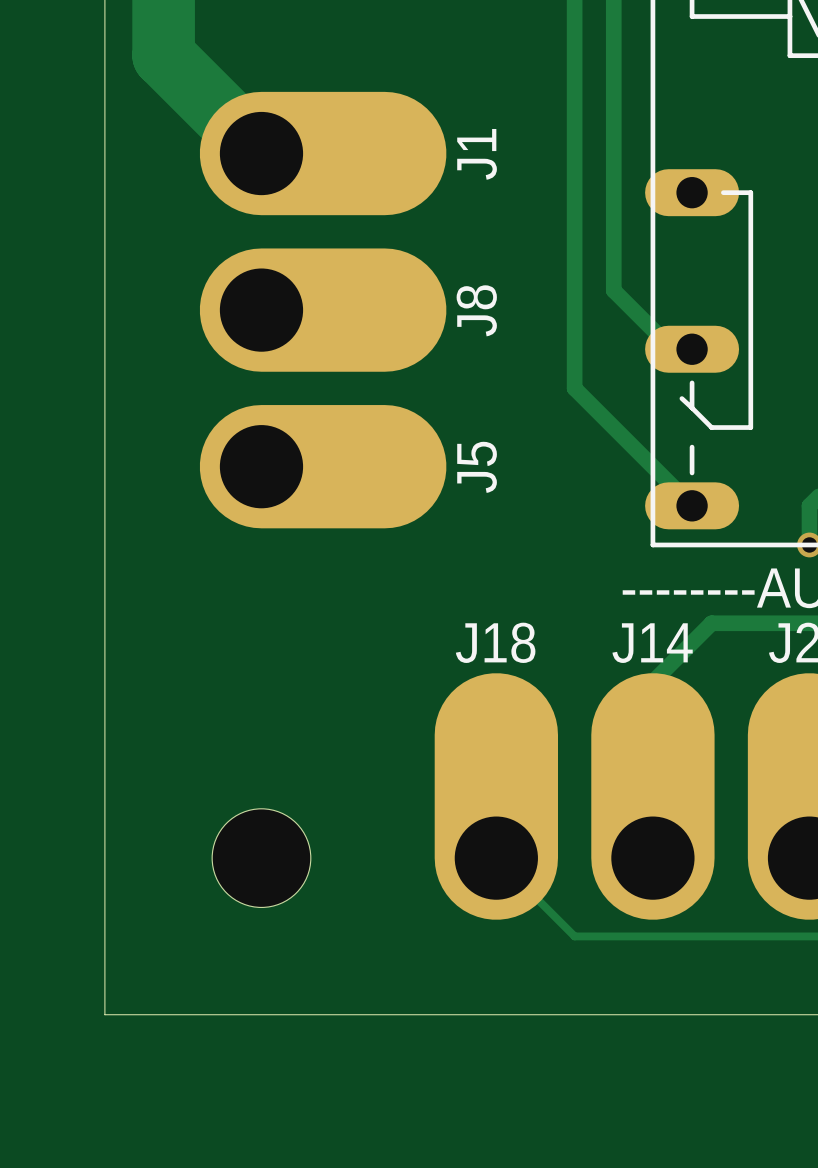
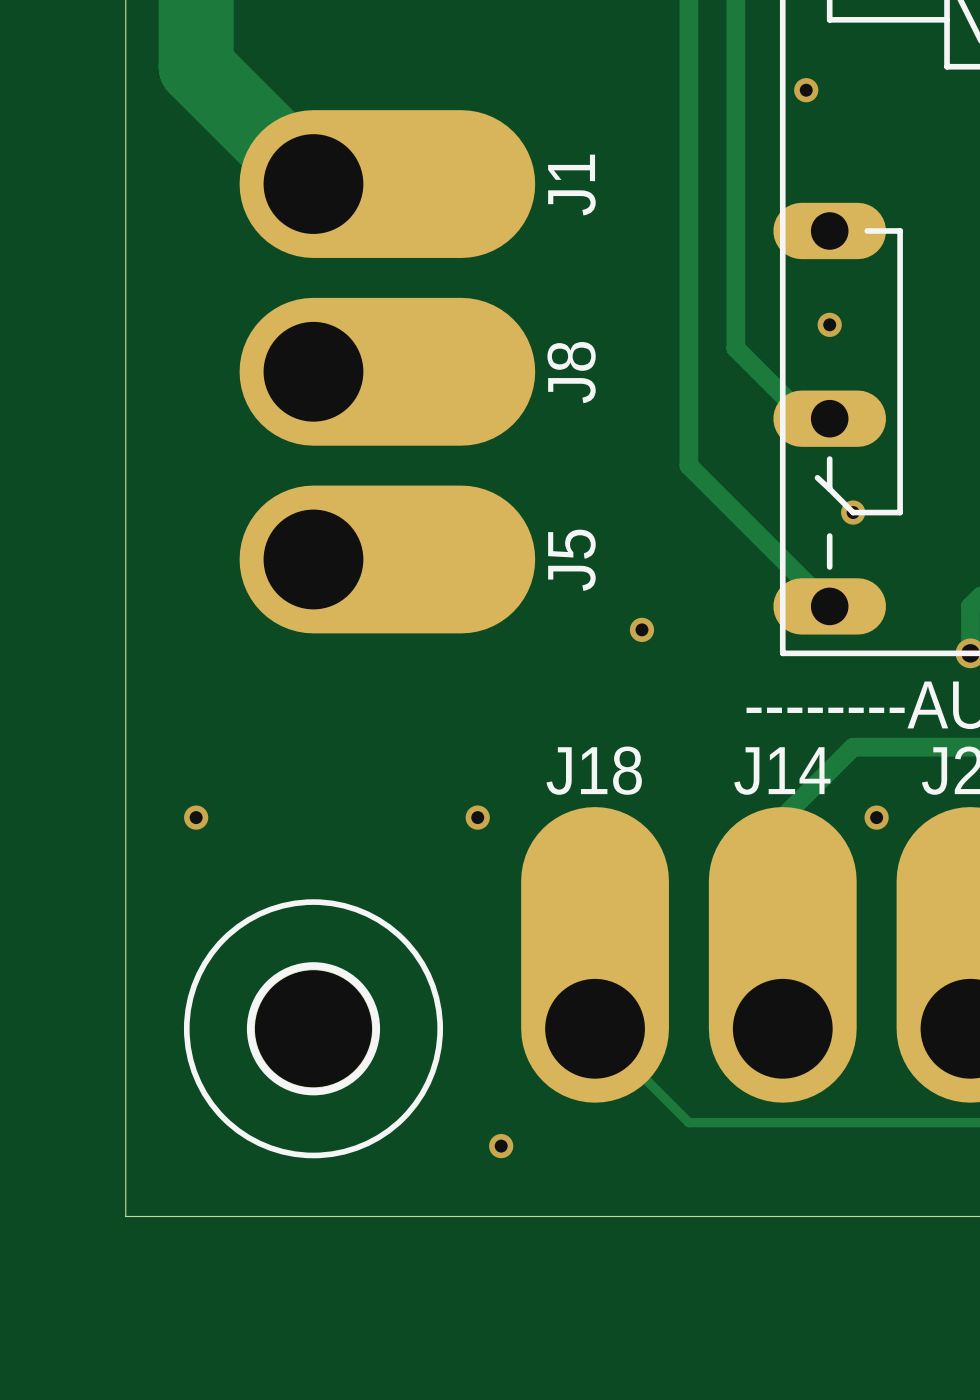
via: none -> (806, 90)
via: none -> (829, 324)
via: none -> (853, 512)
via: none -> (641, 629)
via: none -> (196, 817)
via: none -> (477, 817)
via: none -> (876, 817)
part side: bottom (261, 858) -> top (313, 1028)
via: none -> (501, 1146)

